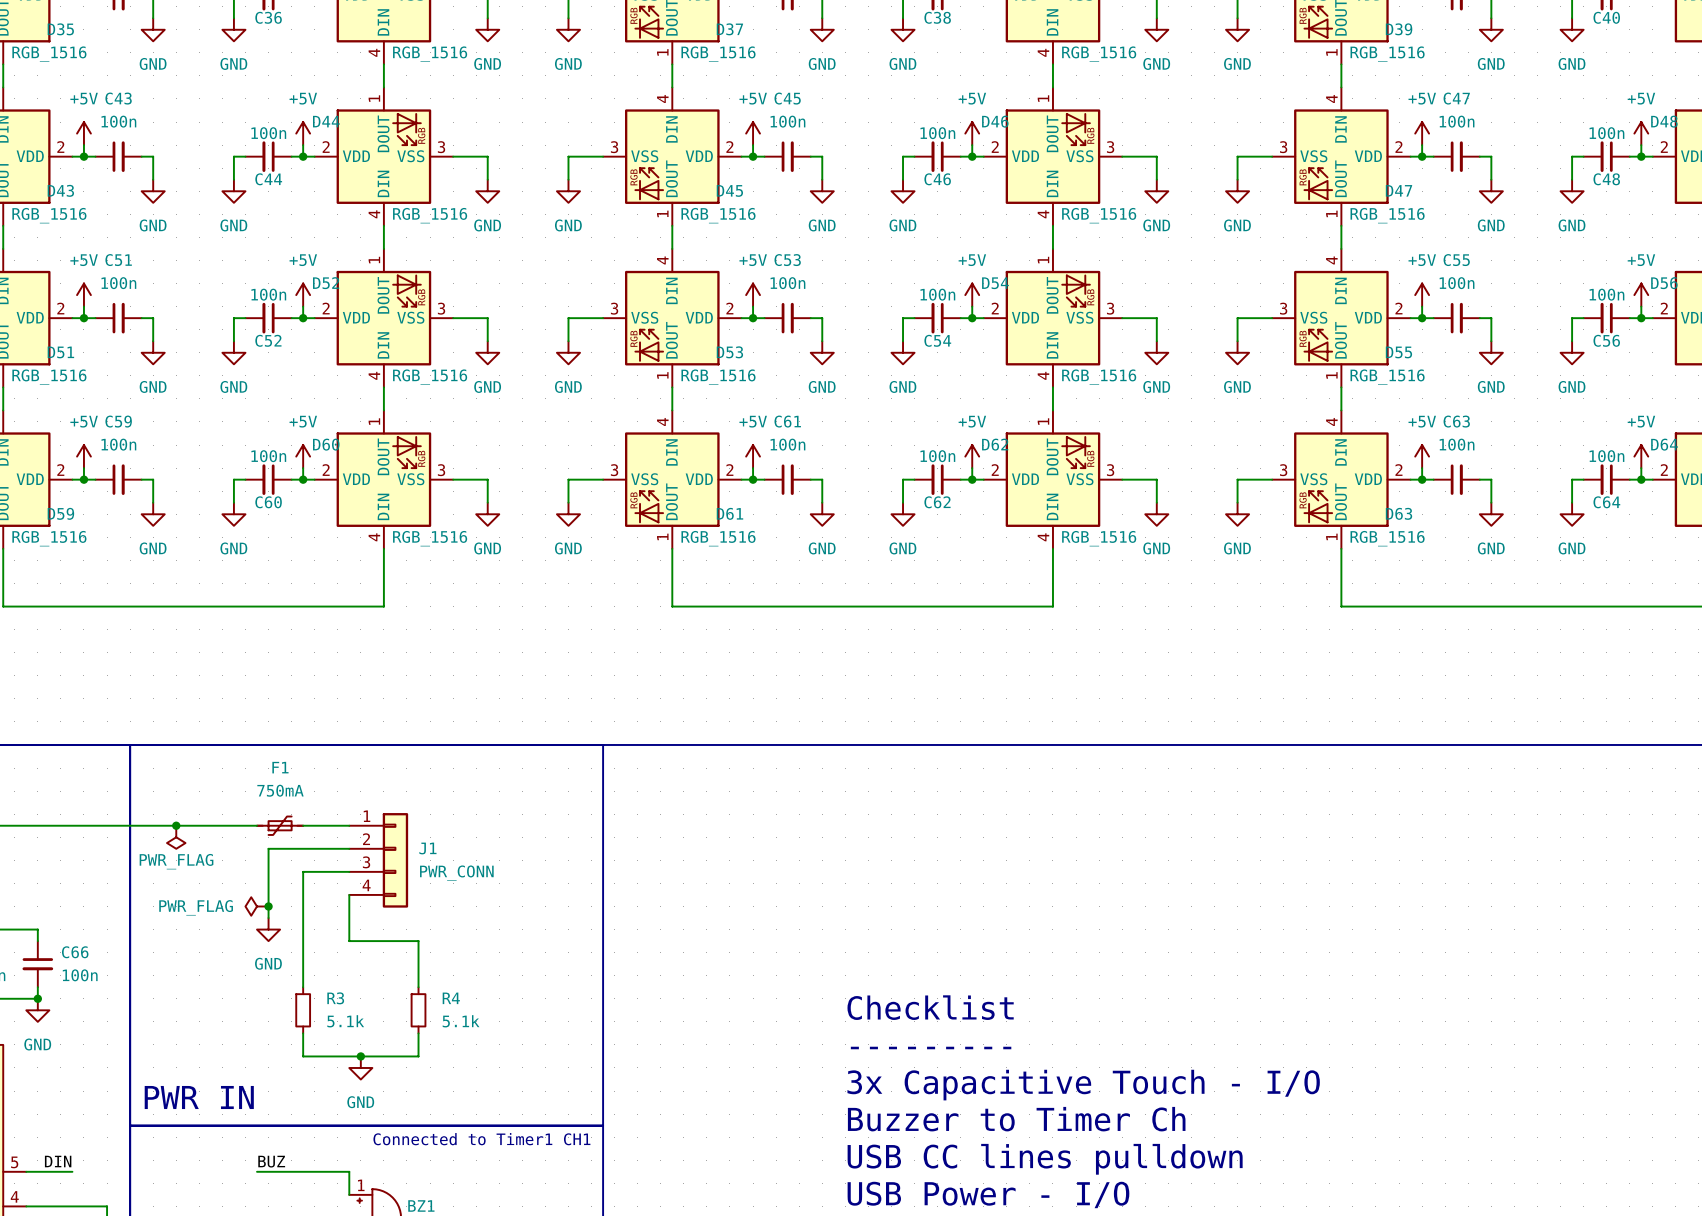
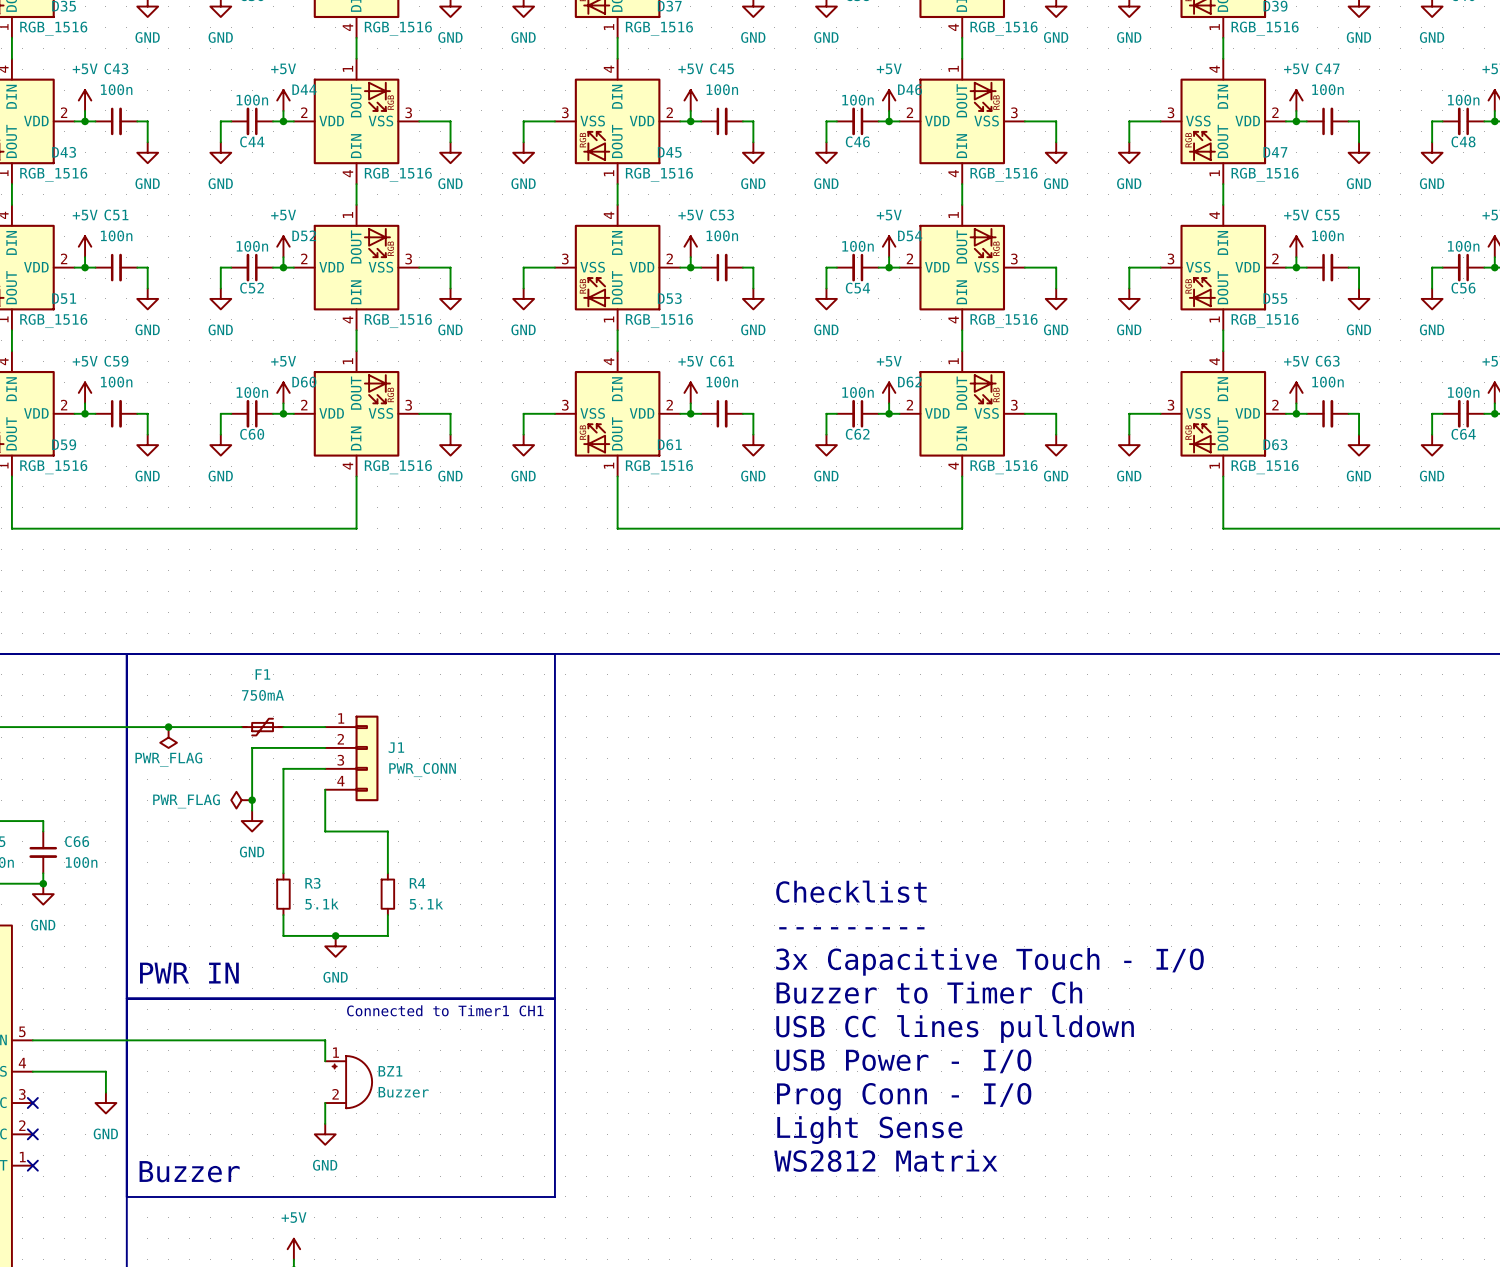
label: DIN (58, 1161) -> none
label: BUZ (271, 1161) -> none
wire: none -> (74, 1040) (241, 1040)

